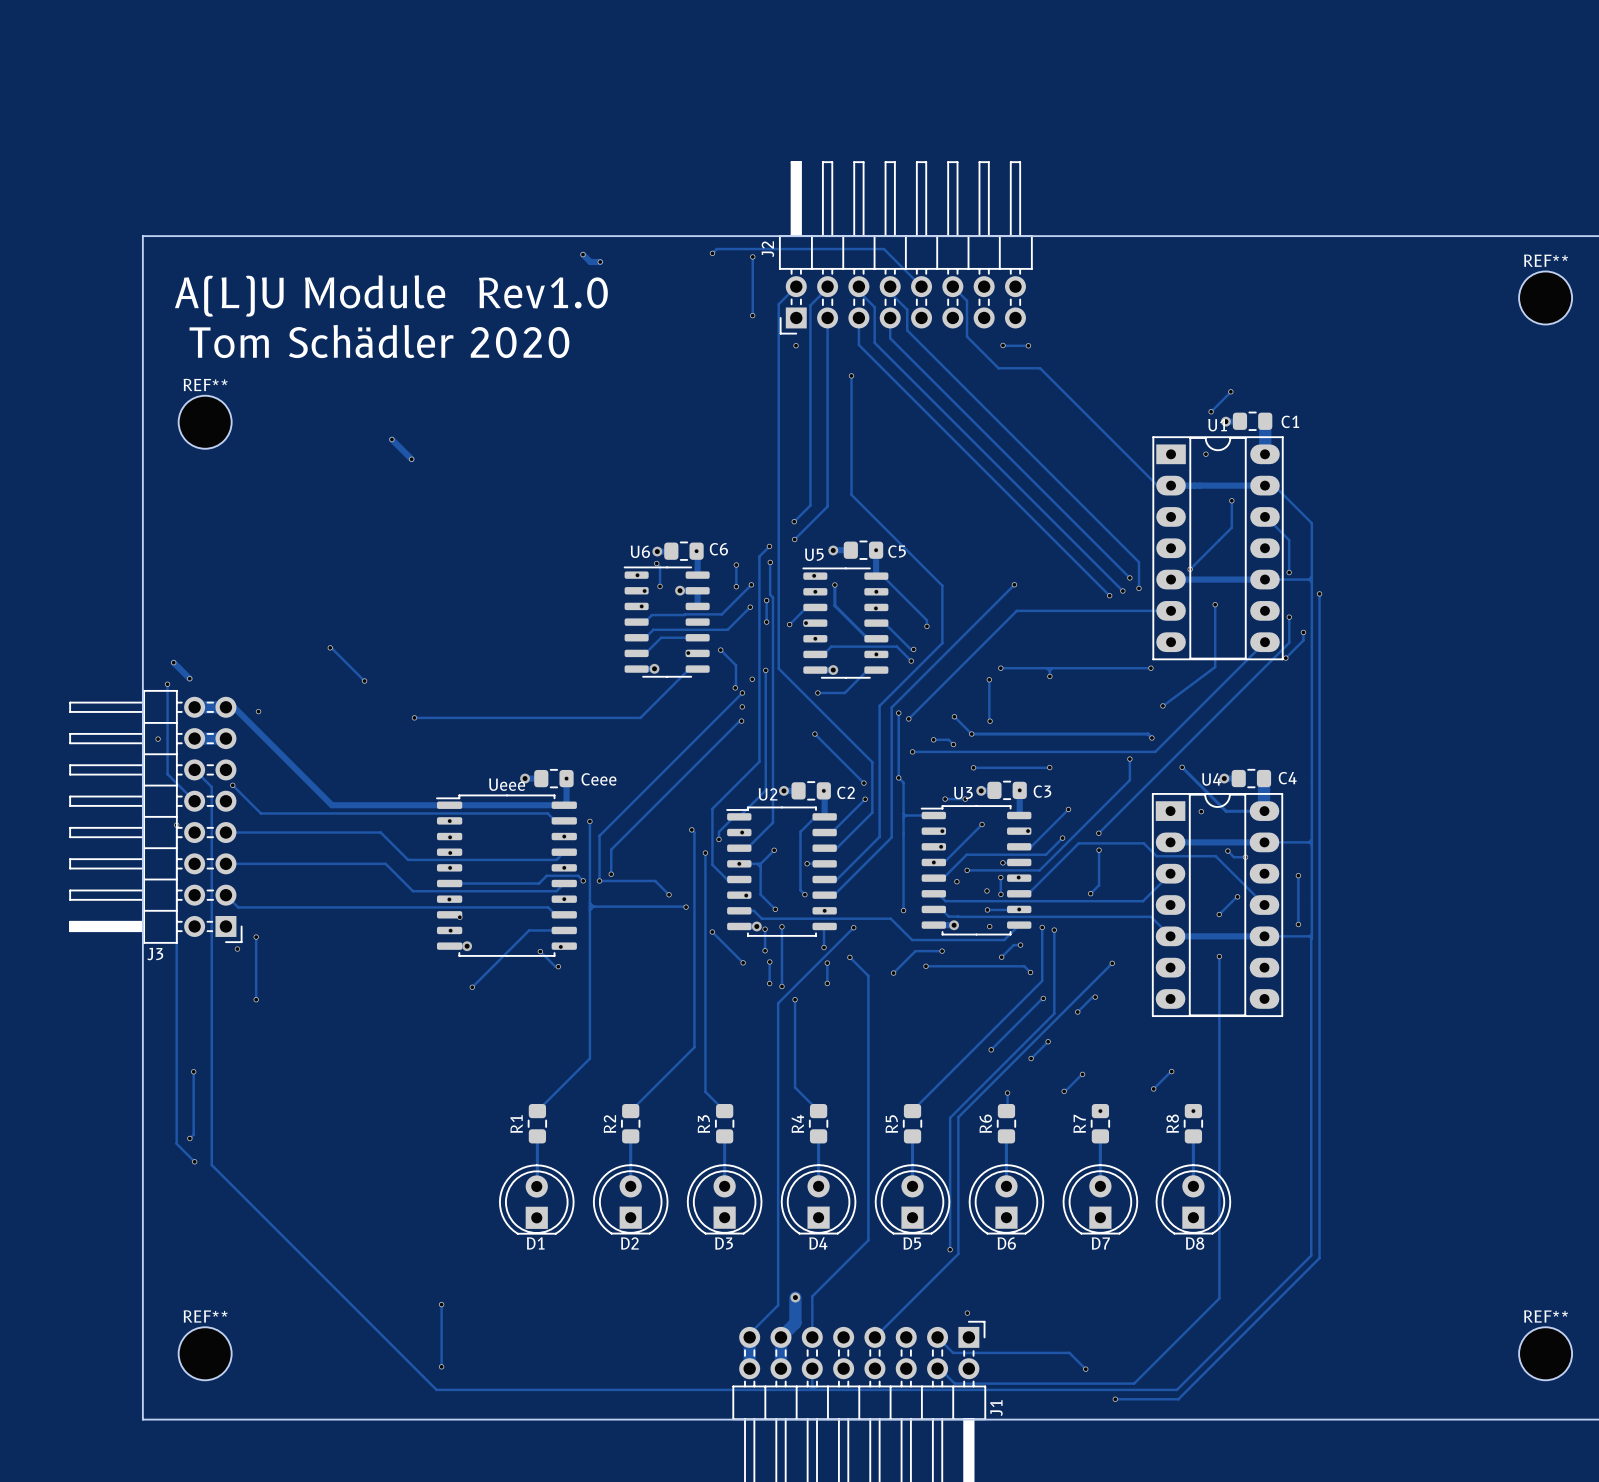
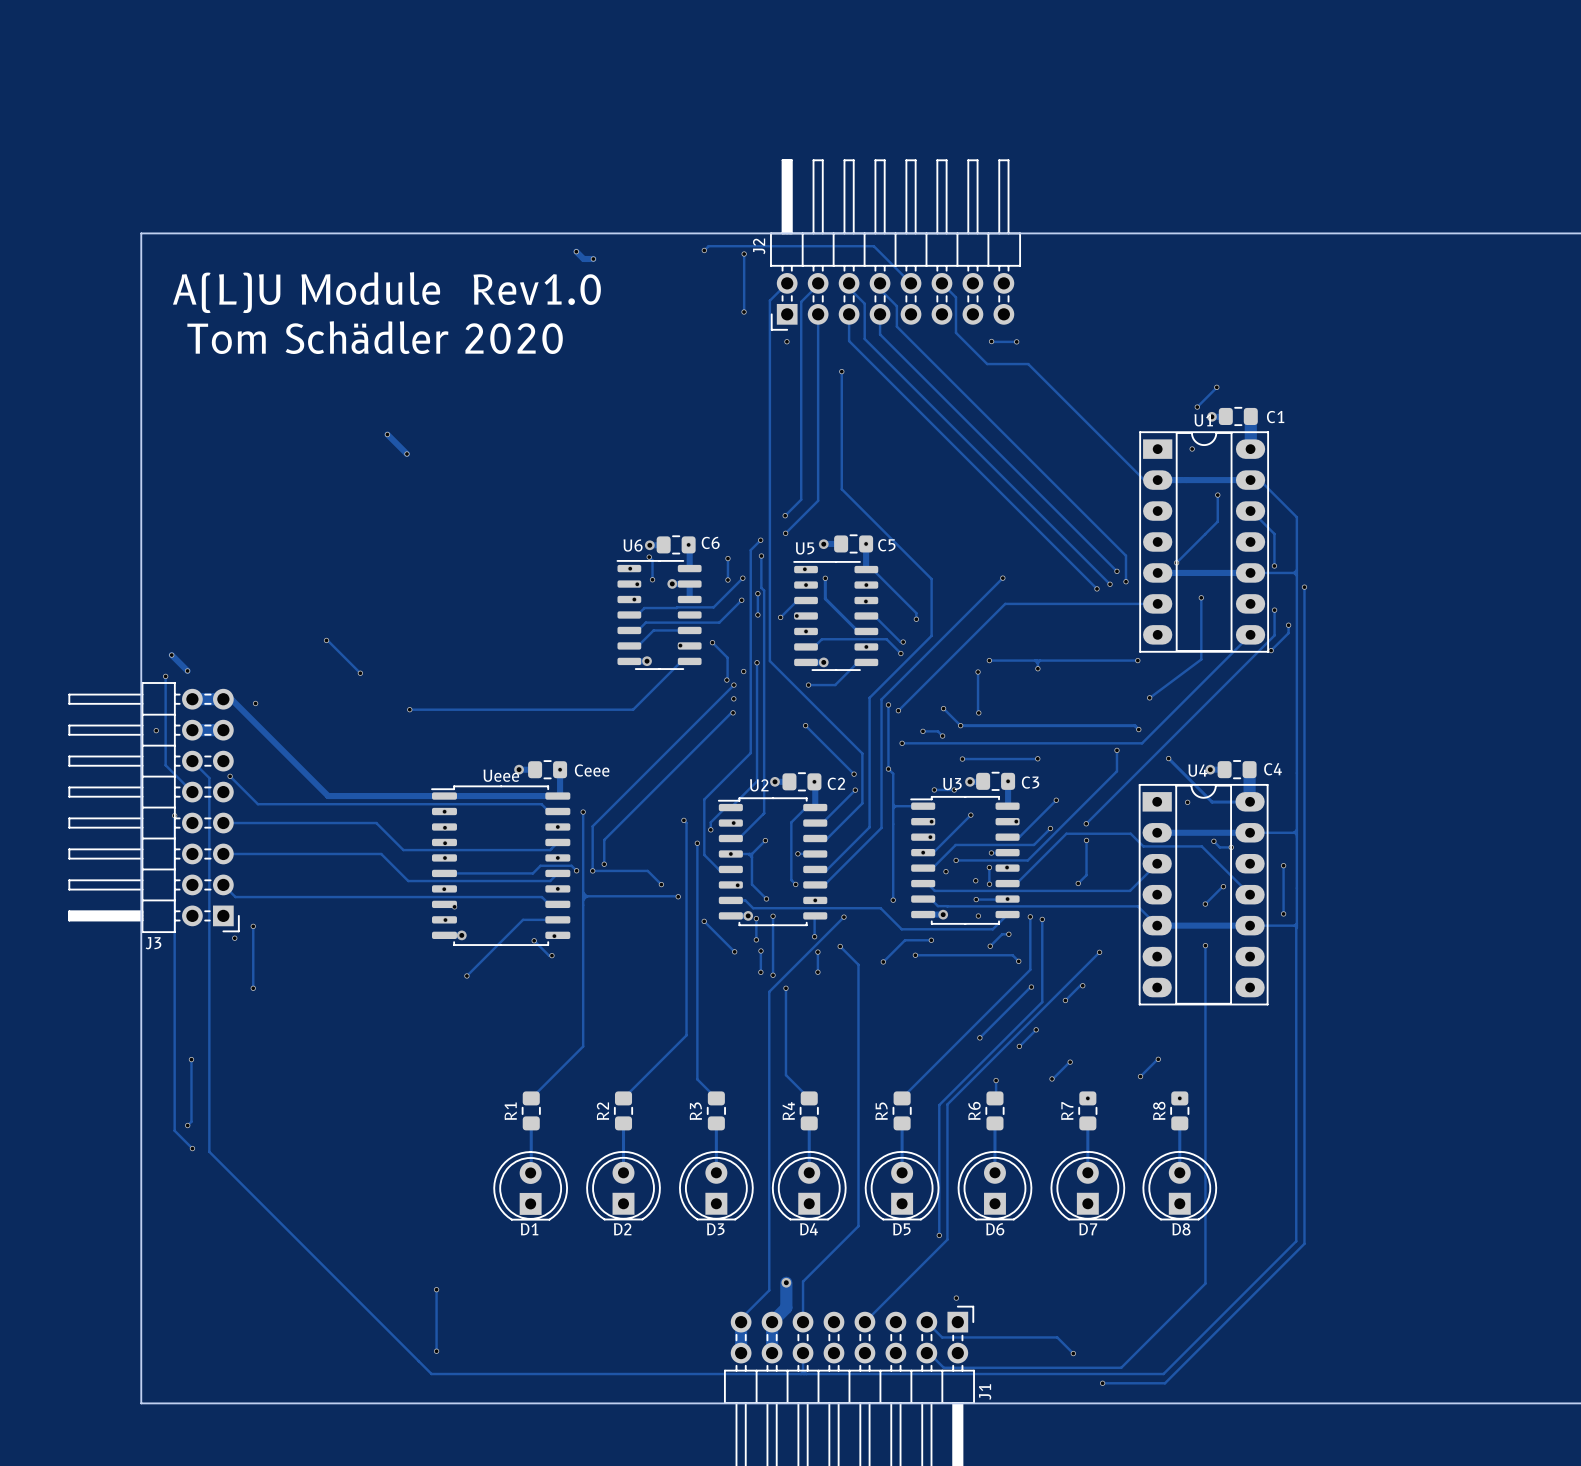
REF**: (1545, 297) -> none
REF**: (205, 422) -> none
REF**: (205, 1353) -> none
REF**: (1545, 1353) -> none

